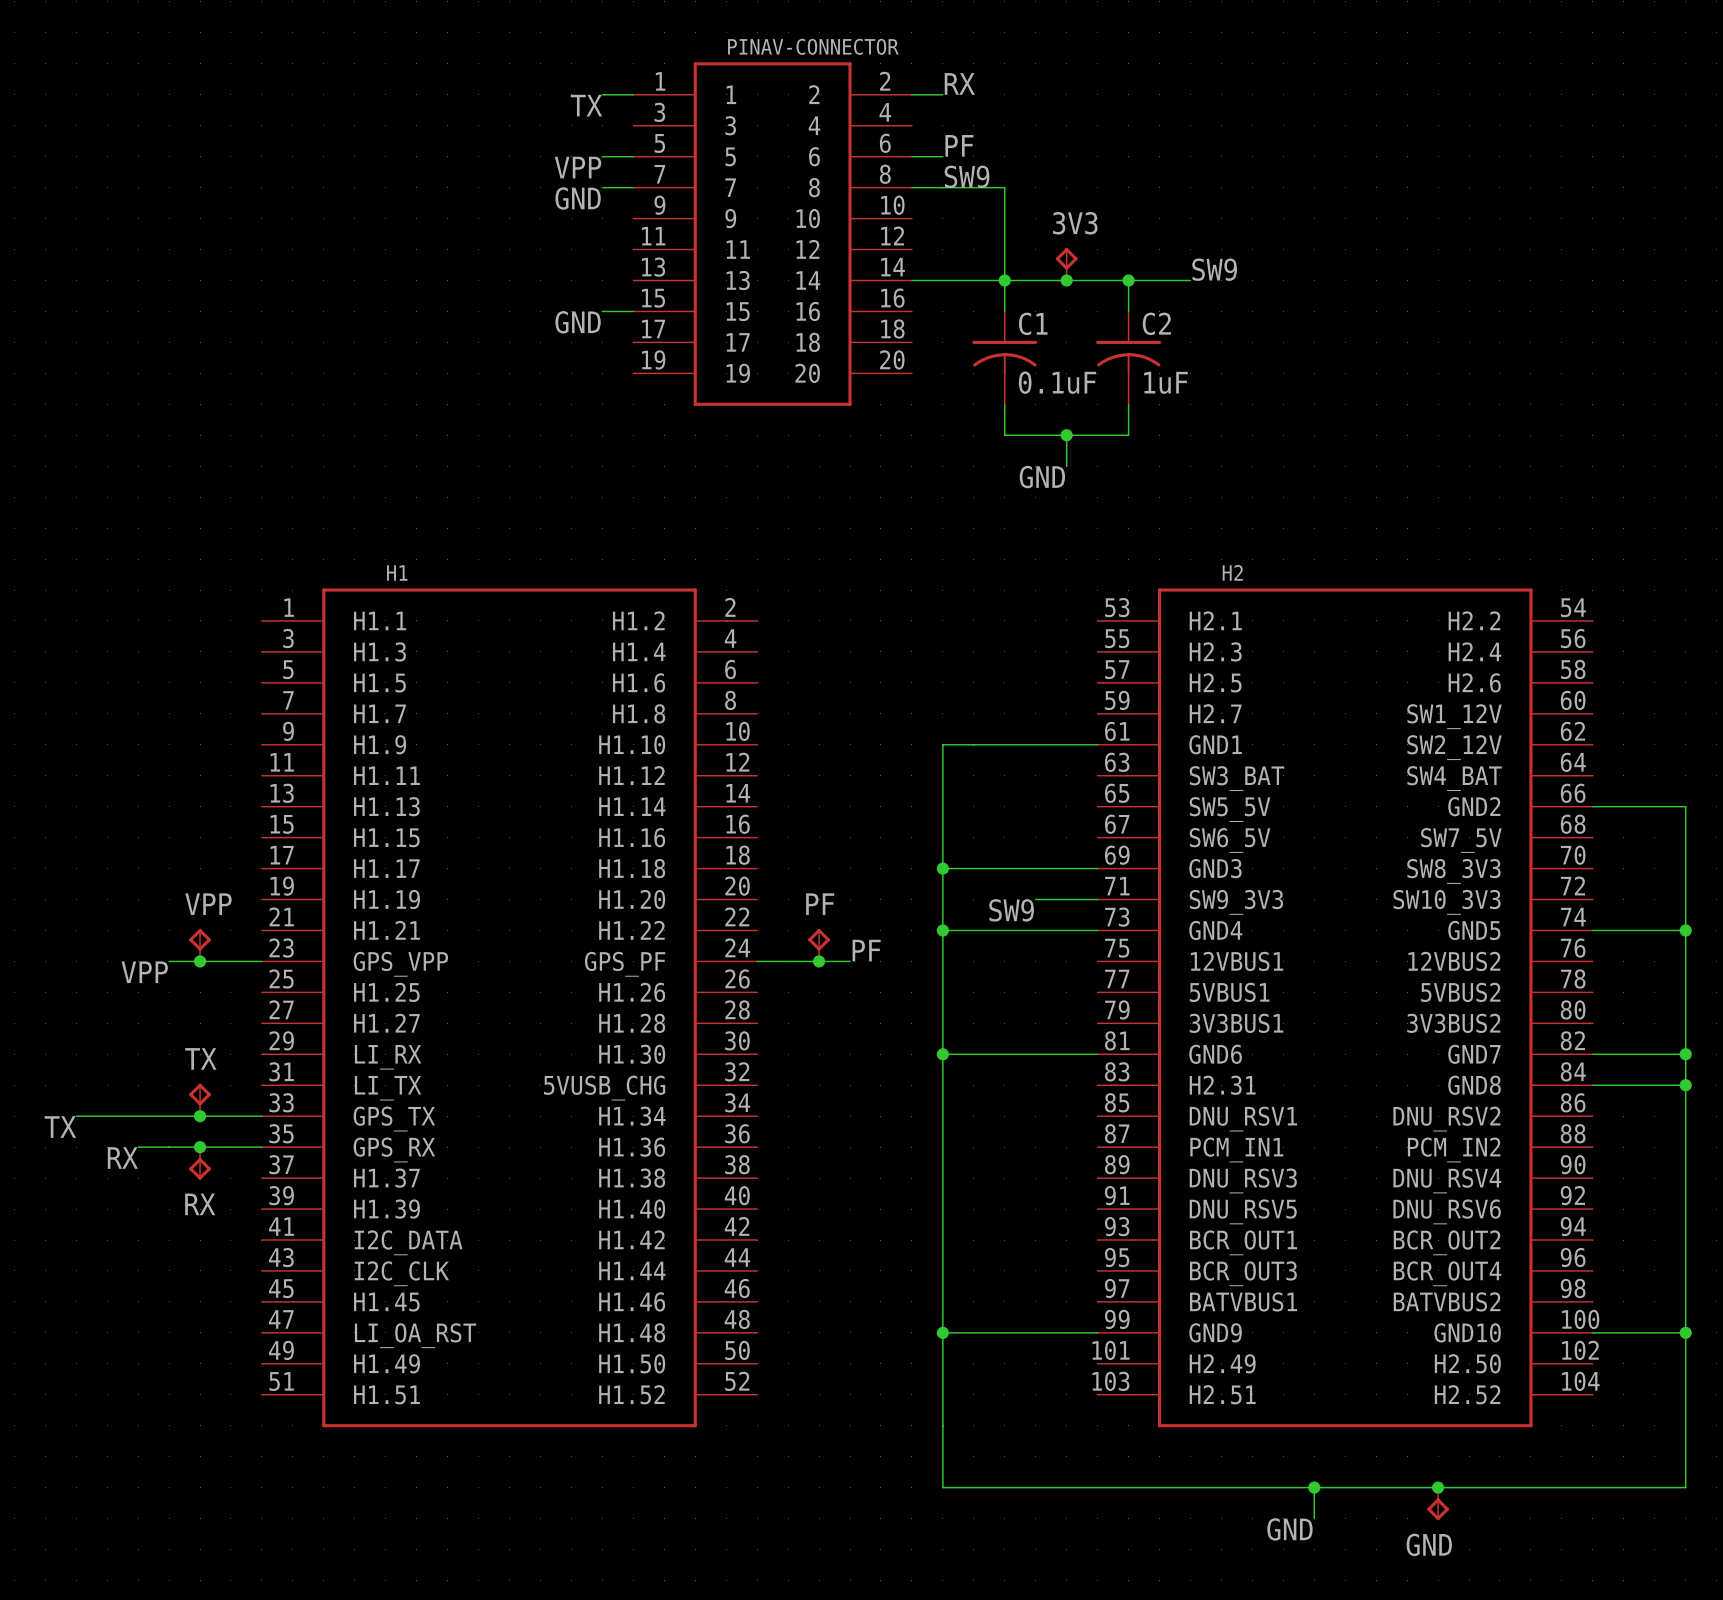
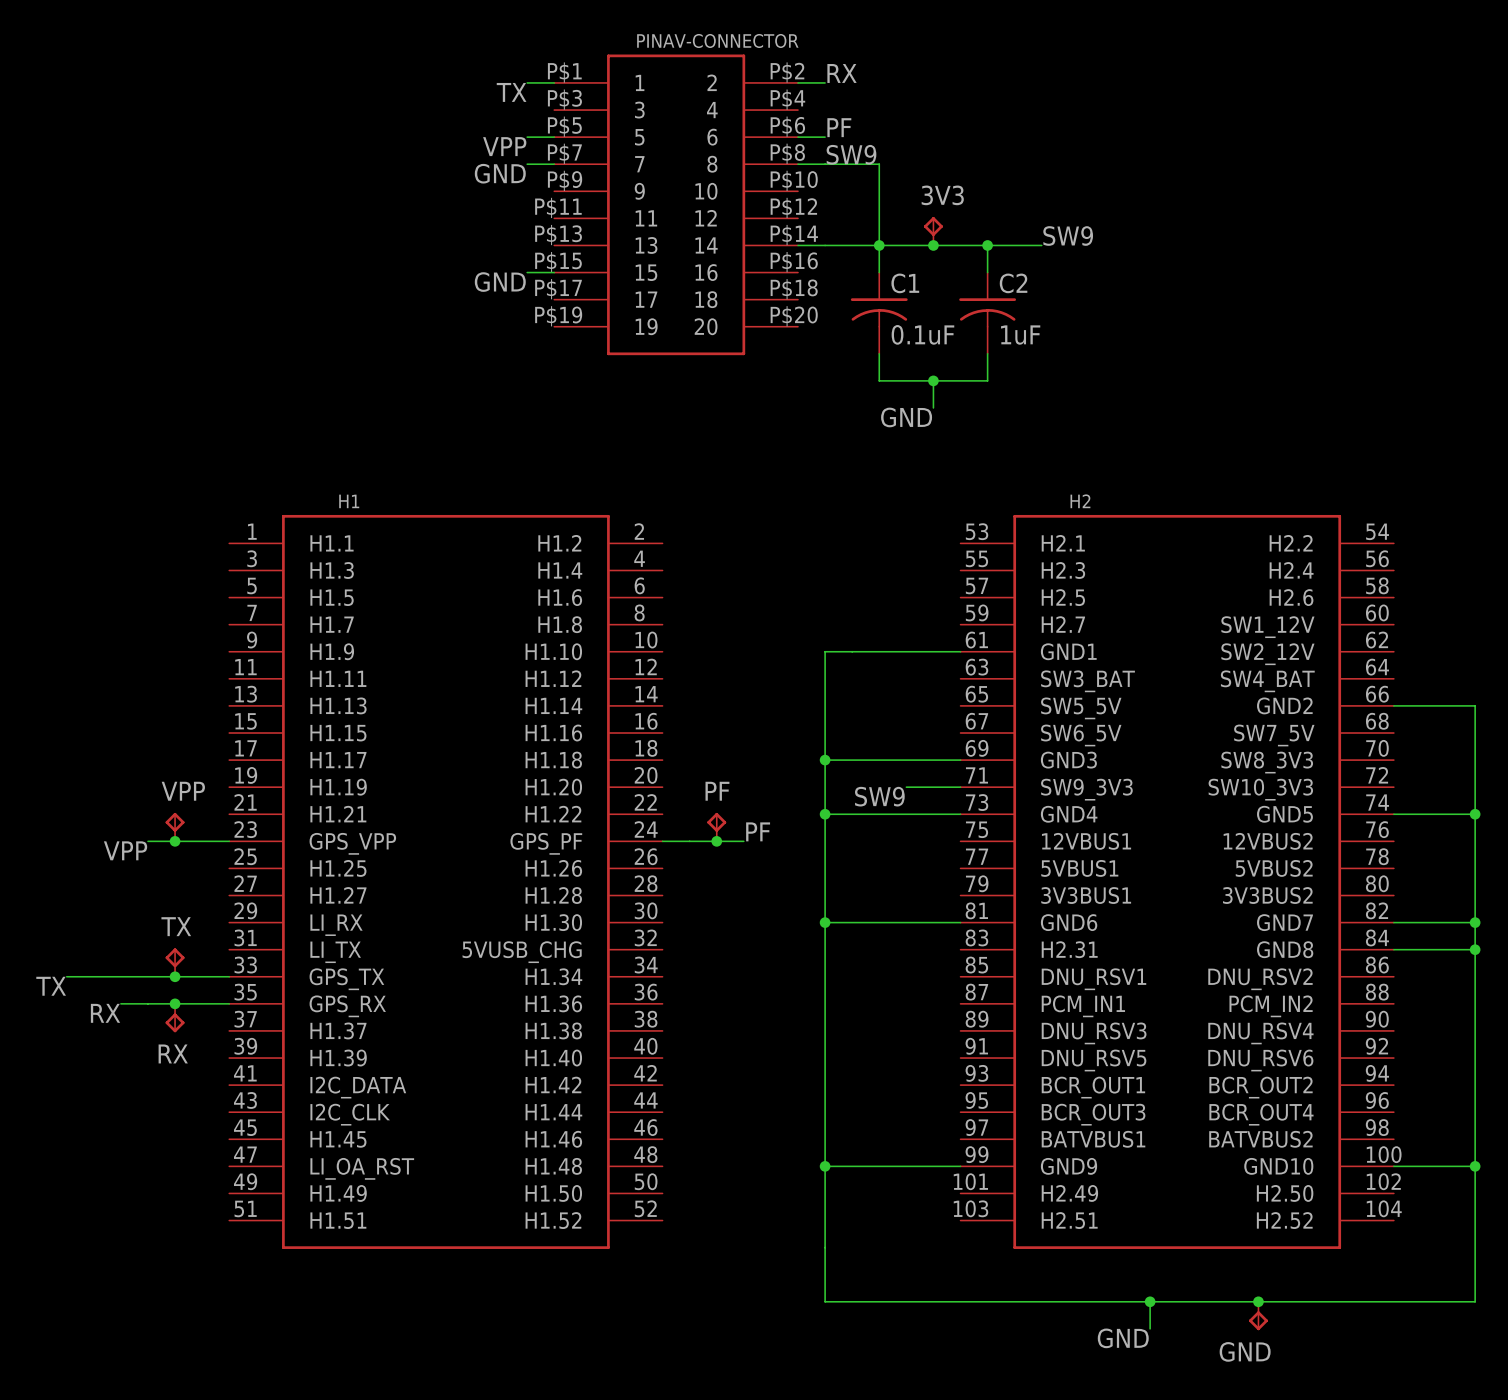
PINAV-CONNECTOR symbol: [633, 62, 912, 406] -> [554, 54, 799, 356]

